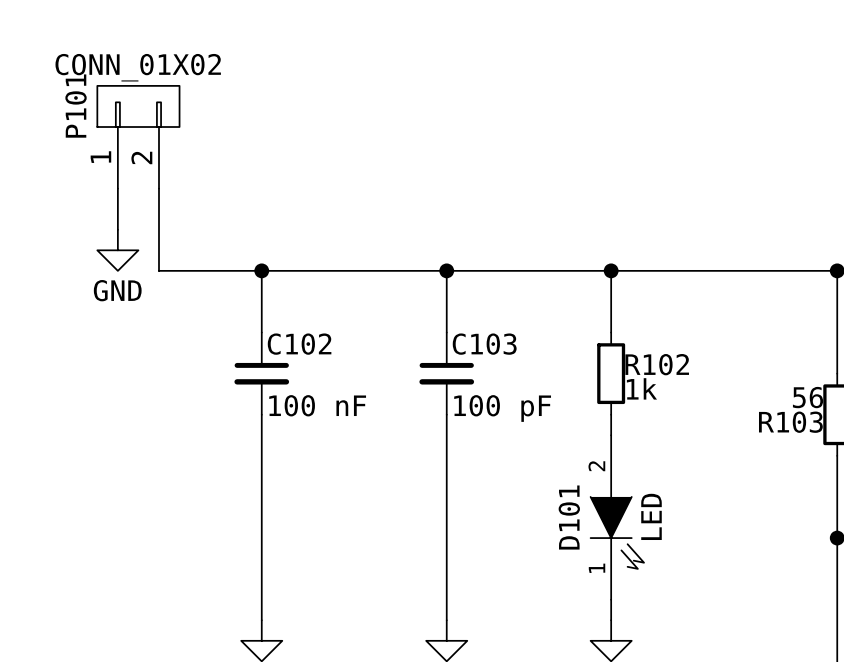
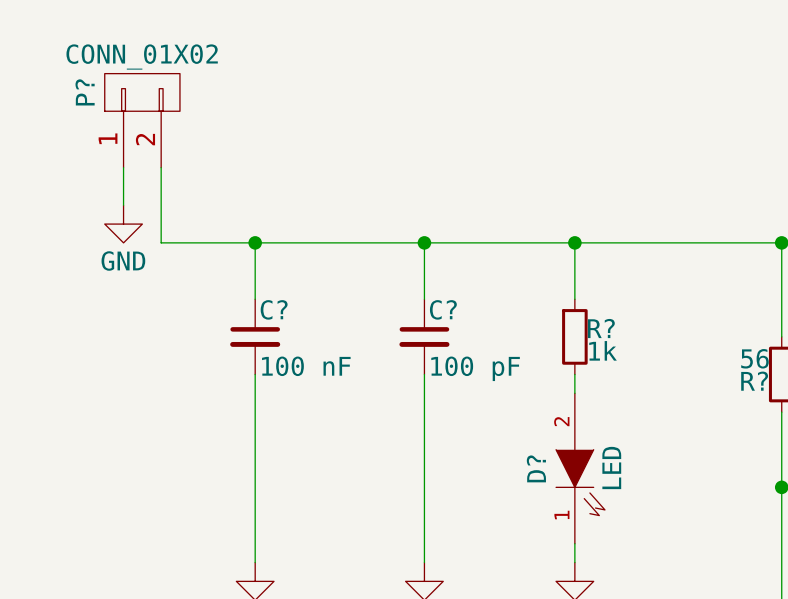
P101 name: P101 (76, 106) -> P? (85, 92)
C102 name: C102 (299, 344) -> C? (274, 309)
C103 name: C103 (484, 344) -> C? (443, 309)
R102 name: R102 (657, 364) -> R? (601, 328)
R103 name: R103 (790, 422) -> R? (754, 381)
D101 name: D101 (569, 517) -> D? (536, 468)

